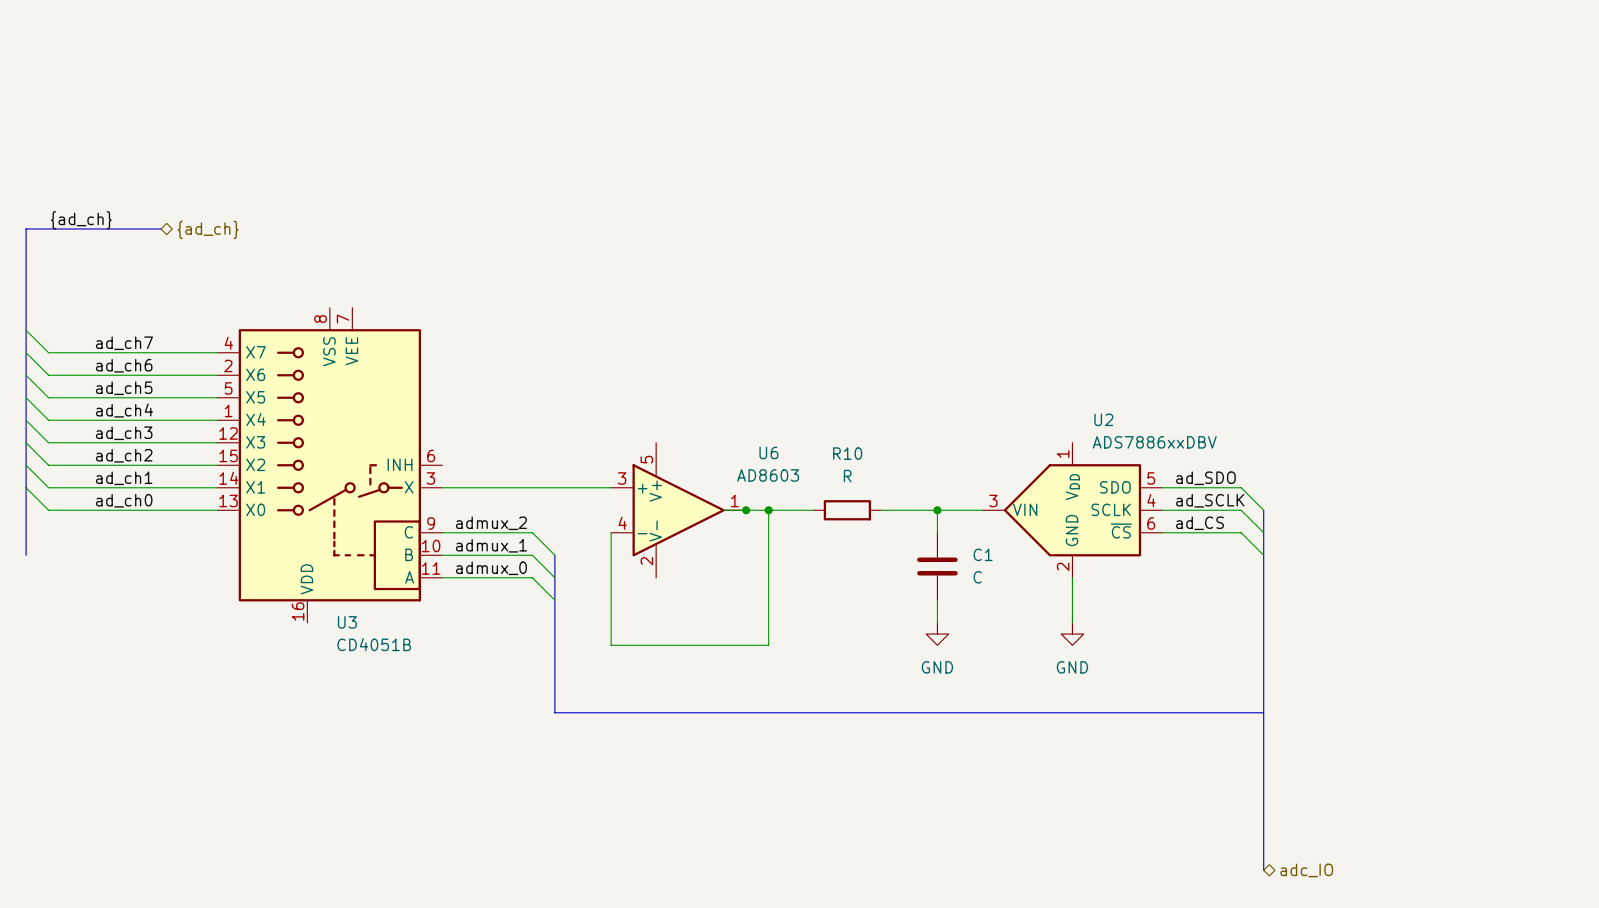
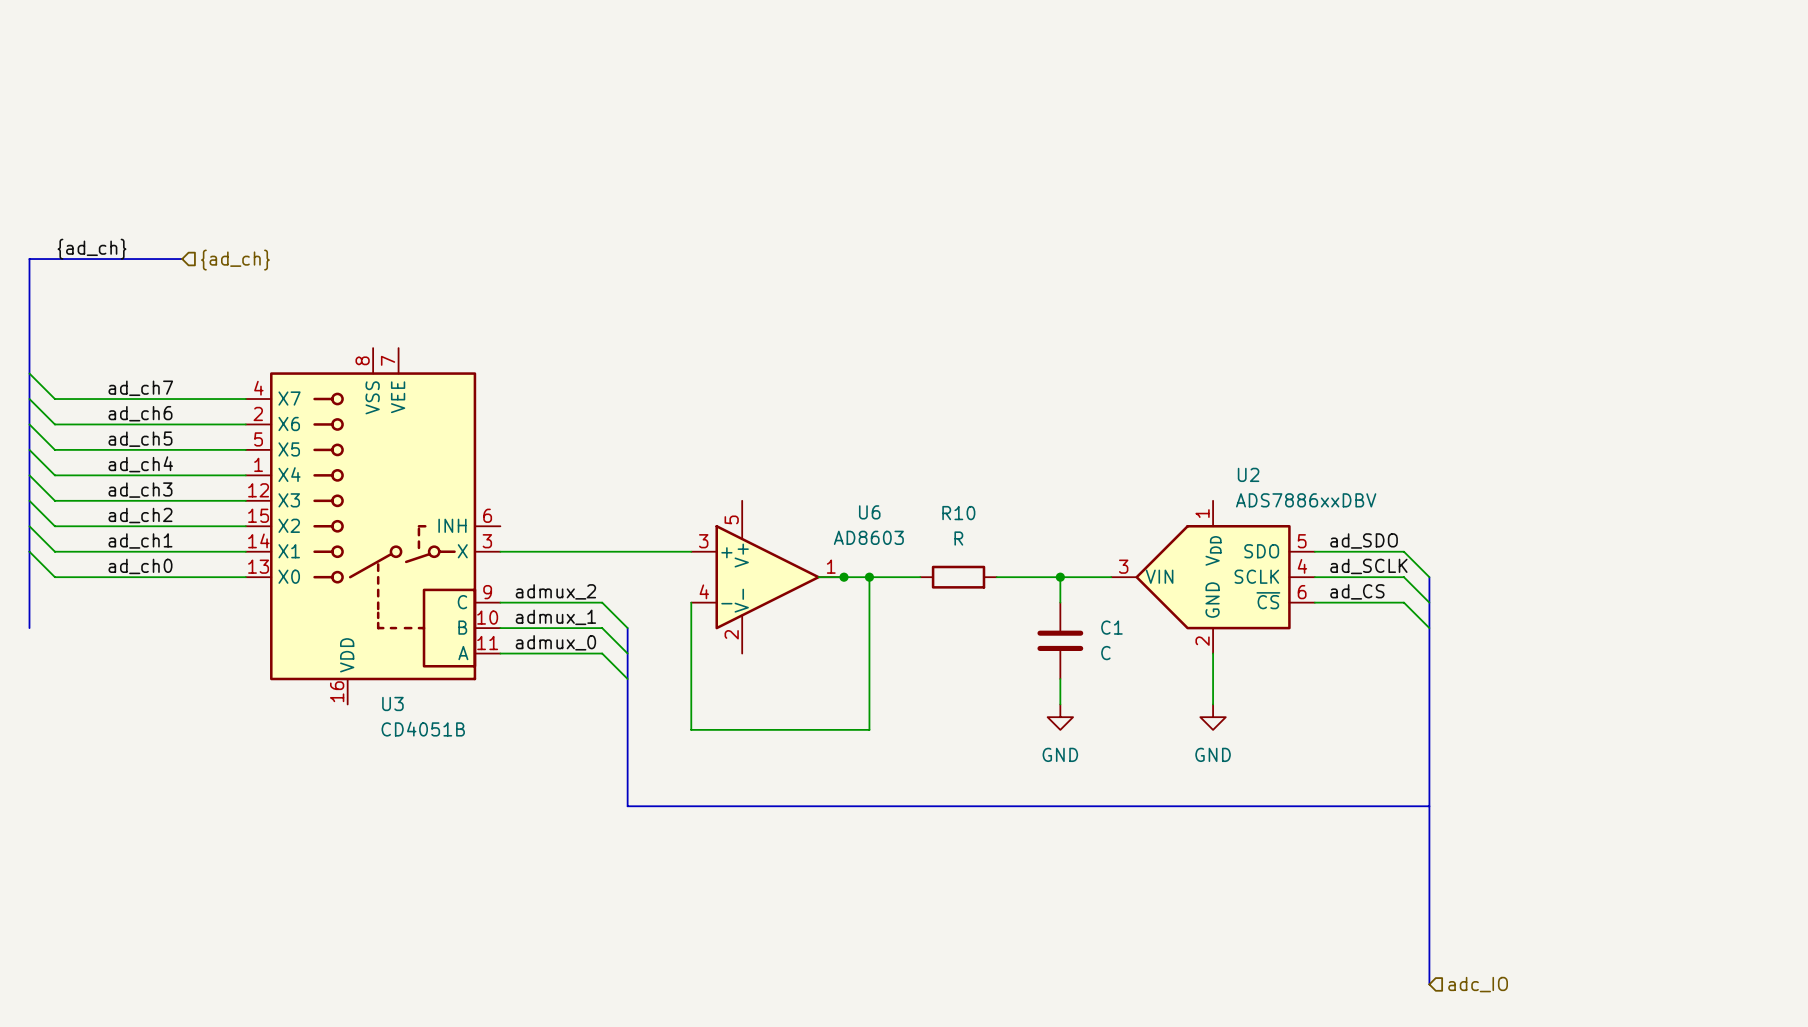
hierarchical label shape: bidirectional (208, 229) -> input (235, 260)
hierarchical label shape: bidirectional (1306, 870) -> input (1478, 984)

